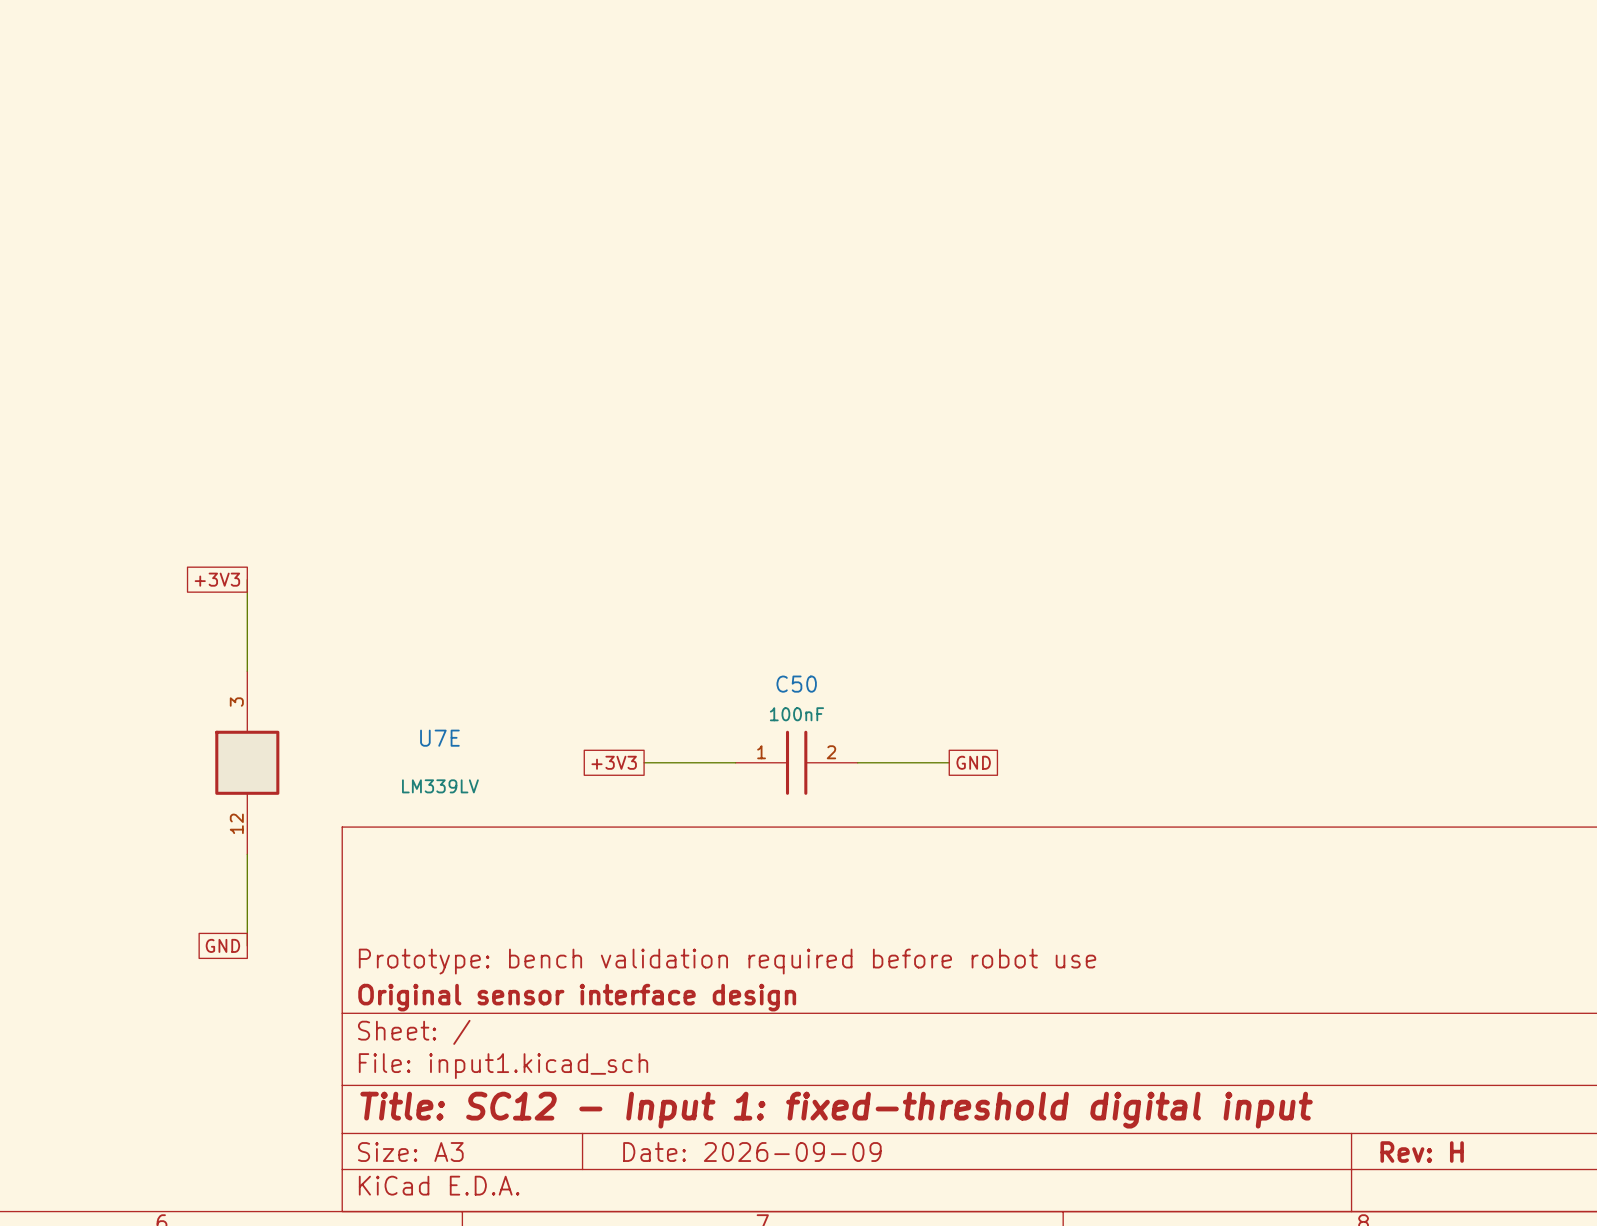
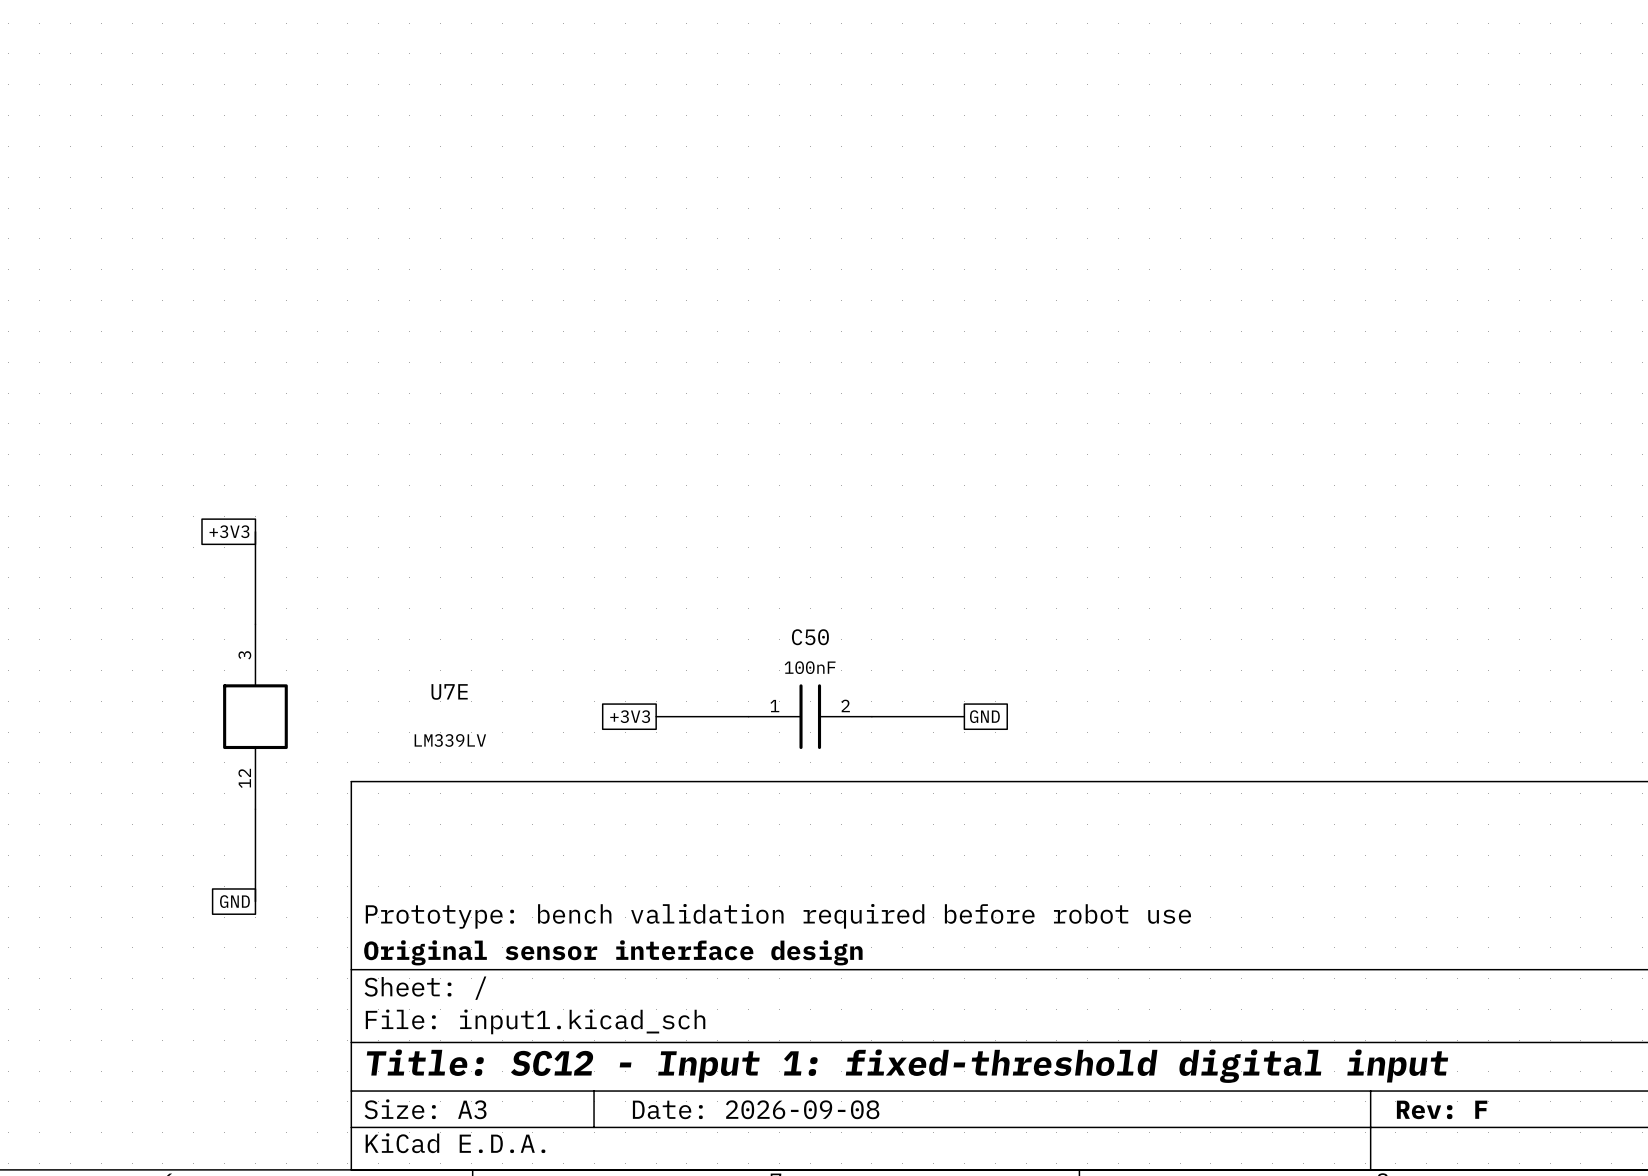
title block: Date: 2026-09-09 (752, 1152) -> Date: 2026-09-08 (756, 1109)
title block: Rev: H (1422, 1152) -> Rev: F (1442, 1109)

